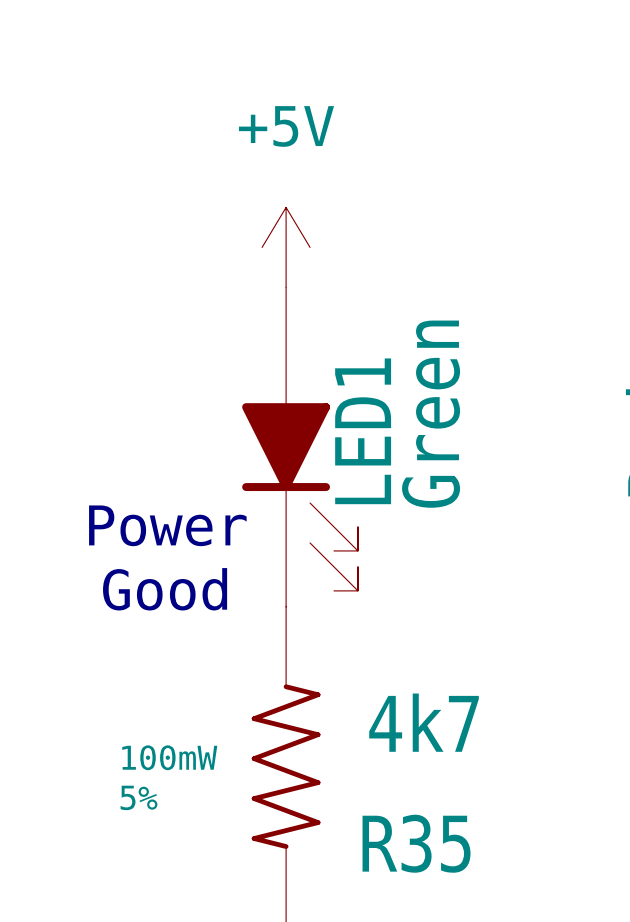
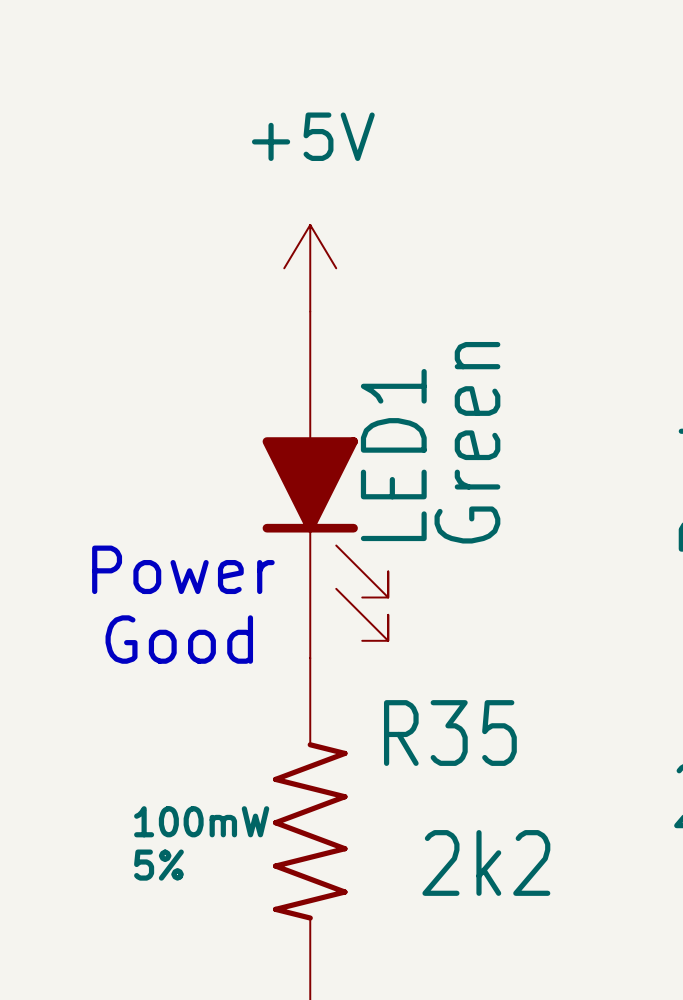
R35 value: 4k7 (424, 722) -> 2k2 (486, 862)
R35 name position: R35 (416, 843) -> R35 (450, 733)

